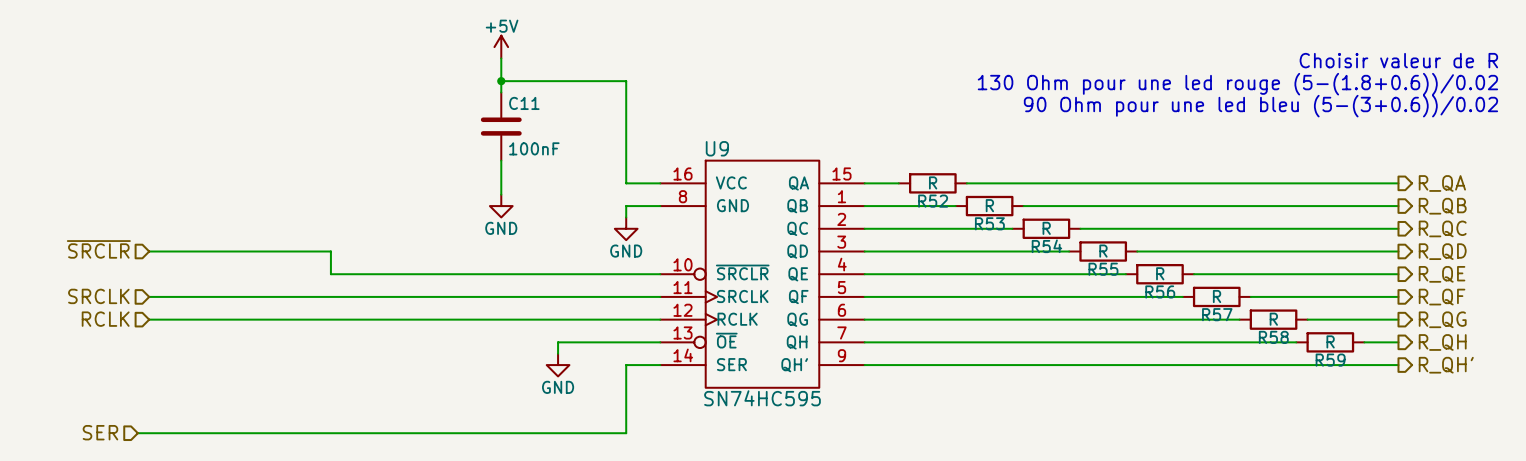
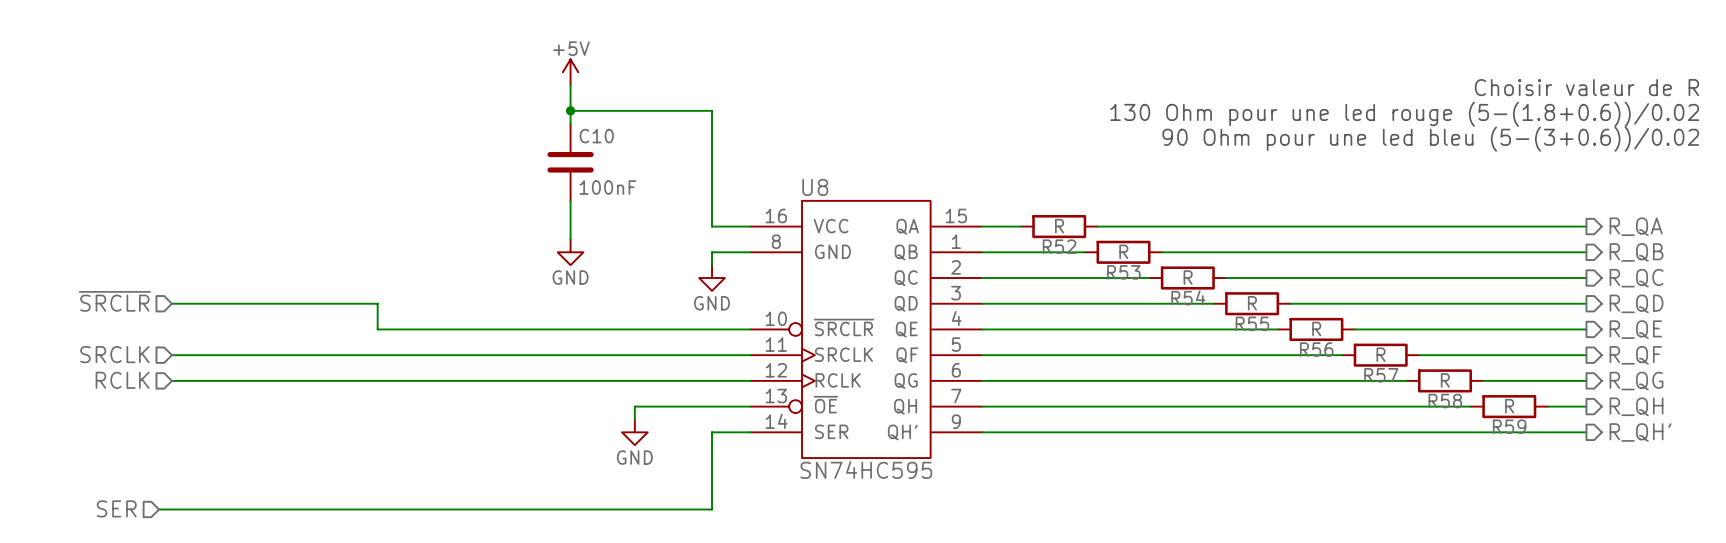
C11 name: C11 (524, 103) -> C10 (596, 136)
U9 name: U9 (717, 148) -> U8 (815, 187)

